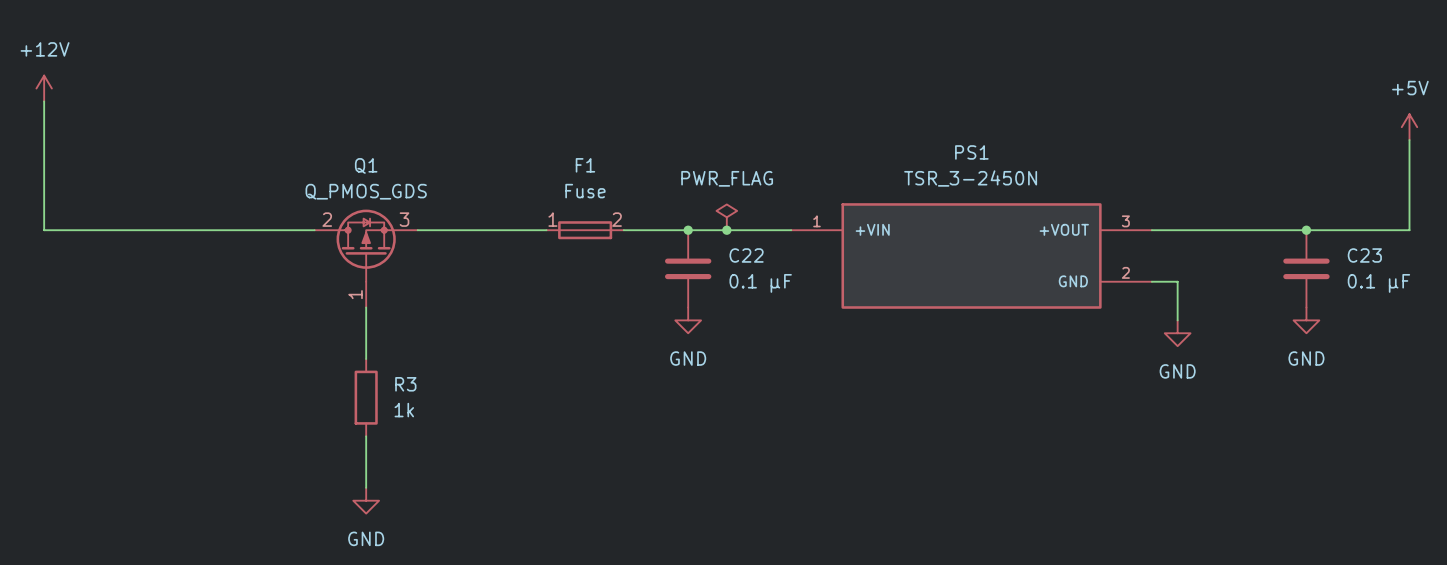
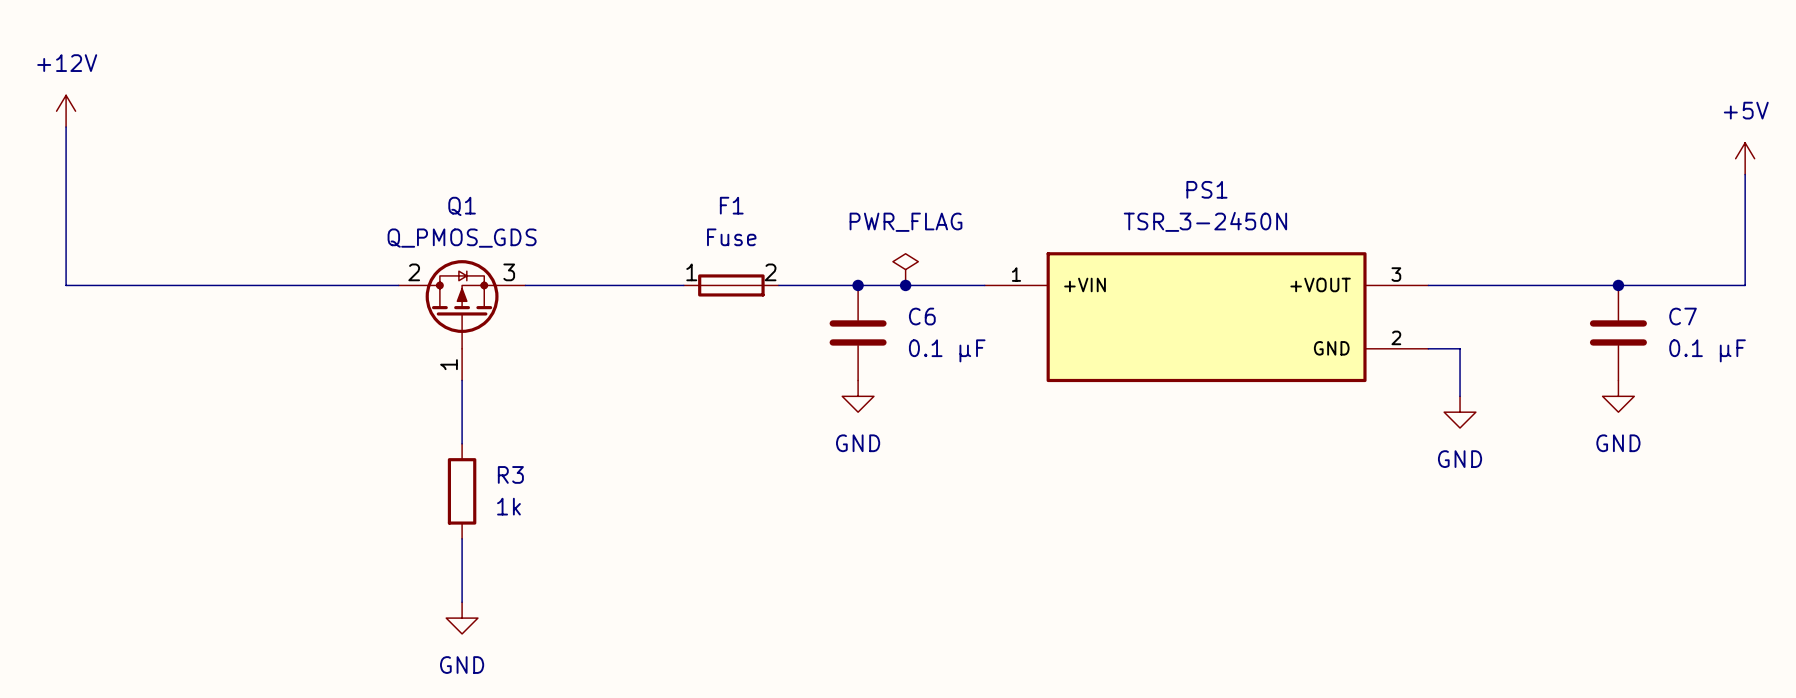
C22 name: C22 (746, 255) -> C6 (922, 316)
C23 name: C23 (1364, 255) -> C7 (1683, 316)

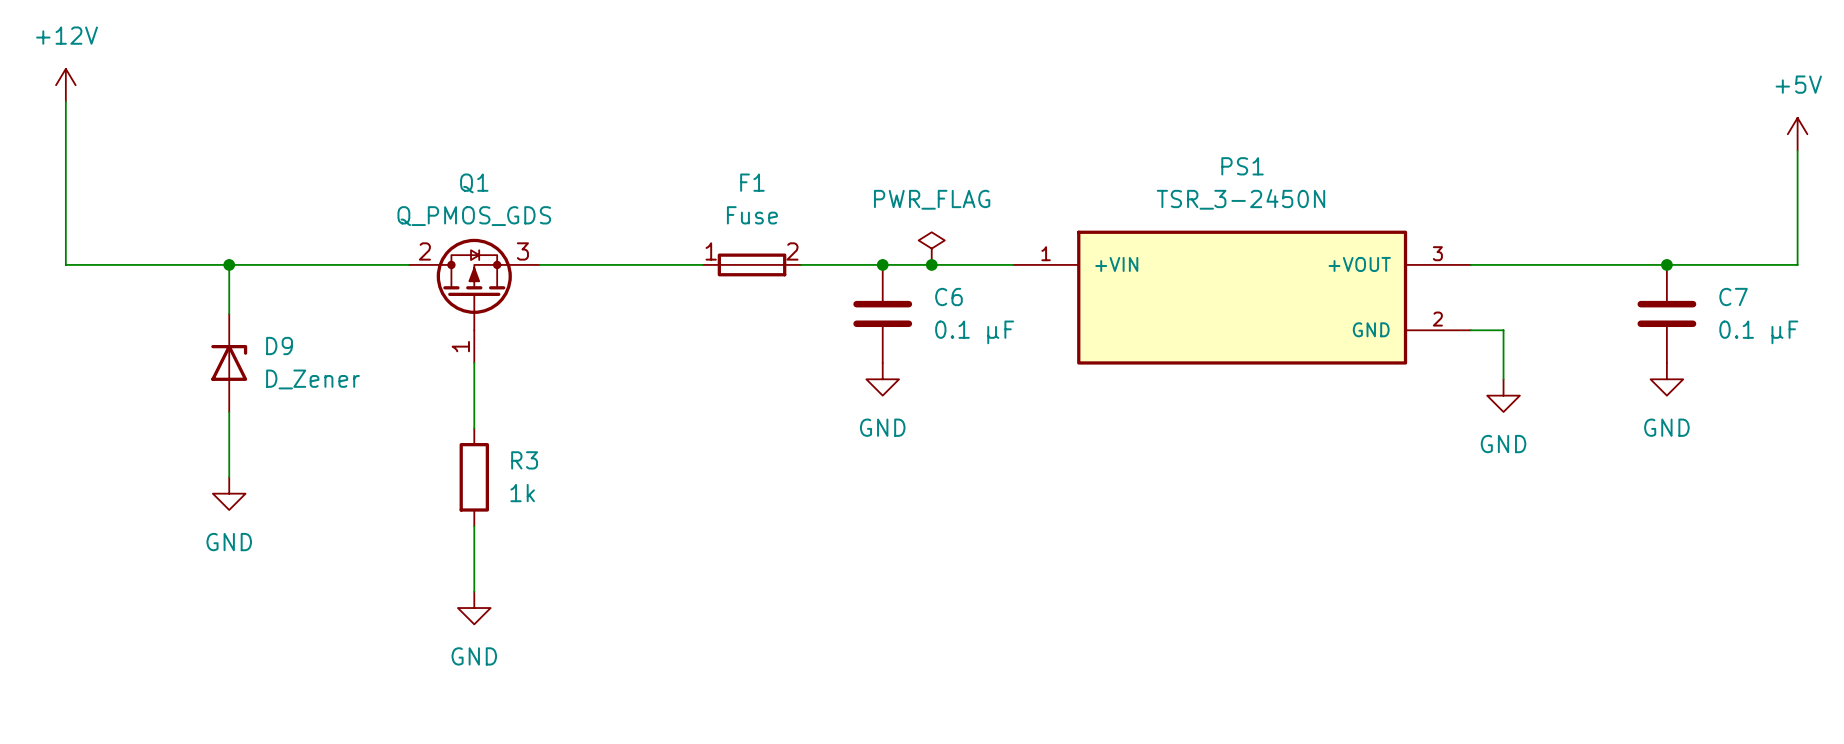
wire: none -> (229, 264) (229, 313)
junction: none -> (229, 264)
D9: none -> D_Zener (229, 362)
wire: none -> (229, 411) (229, 477)
power symbol: none -> GND (229, 493)

